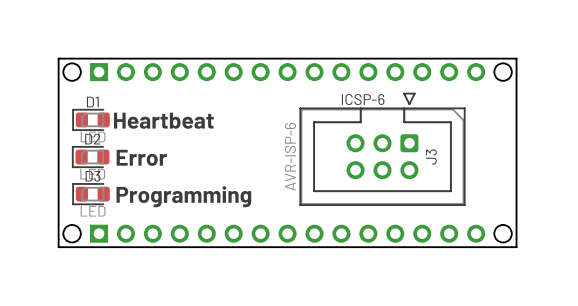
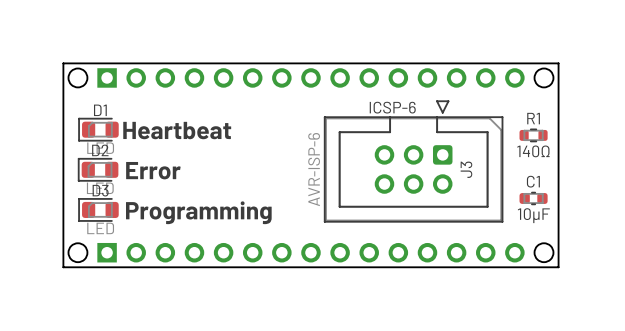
R1: none -> 140Ω (533, 135)
C1: none -> 10µF (533, 198)

